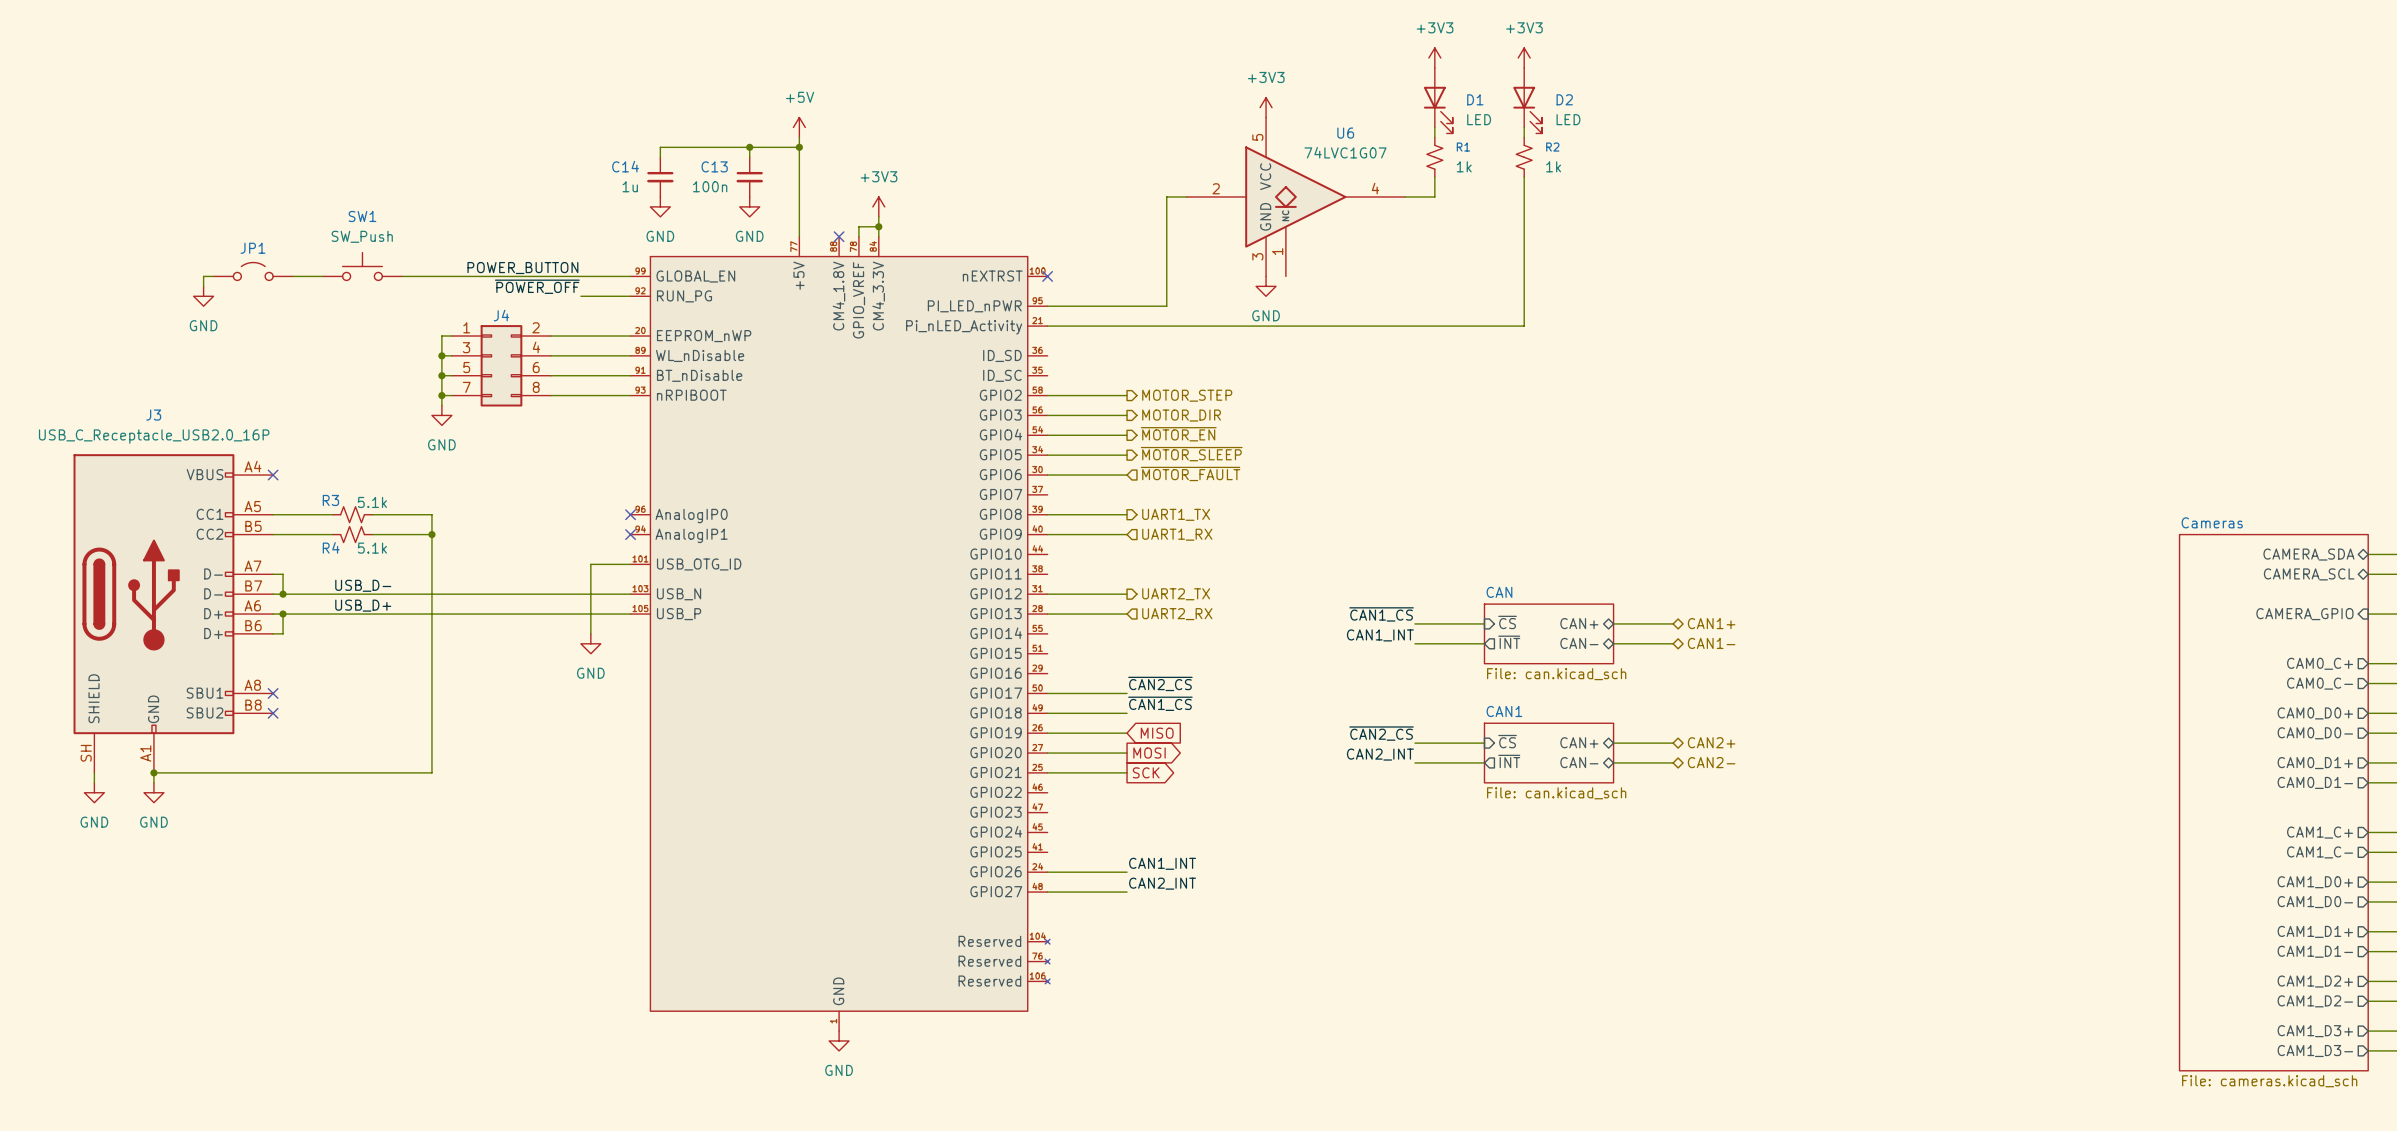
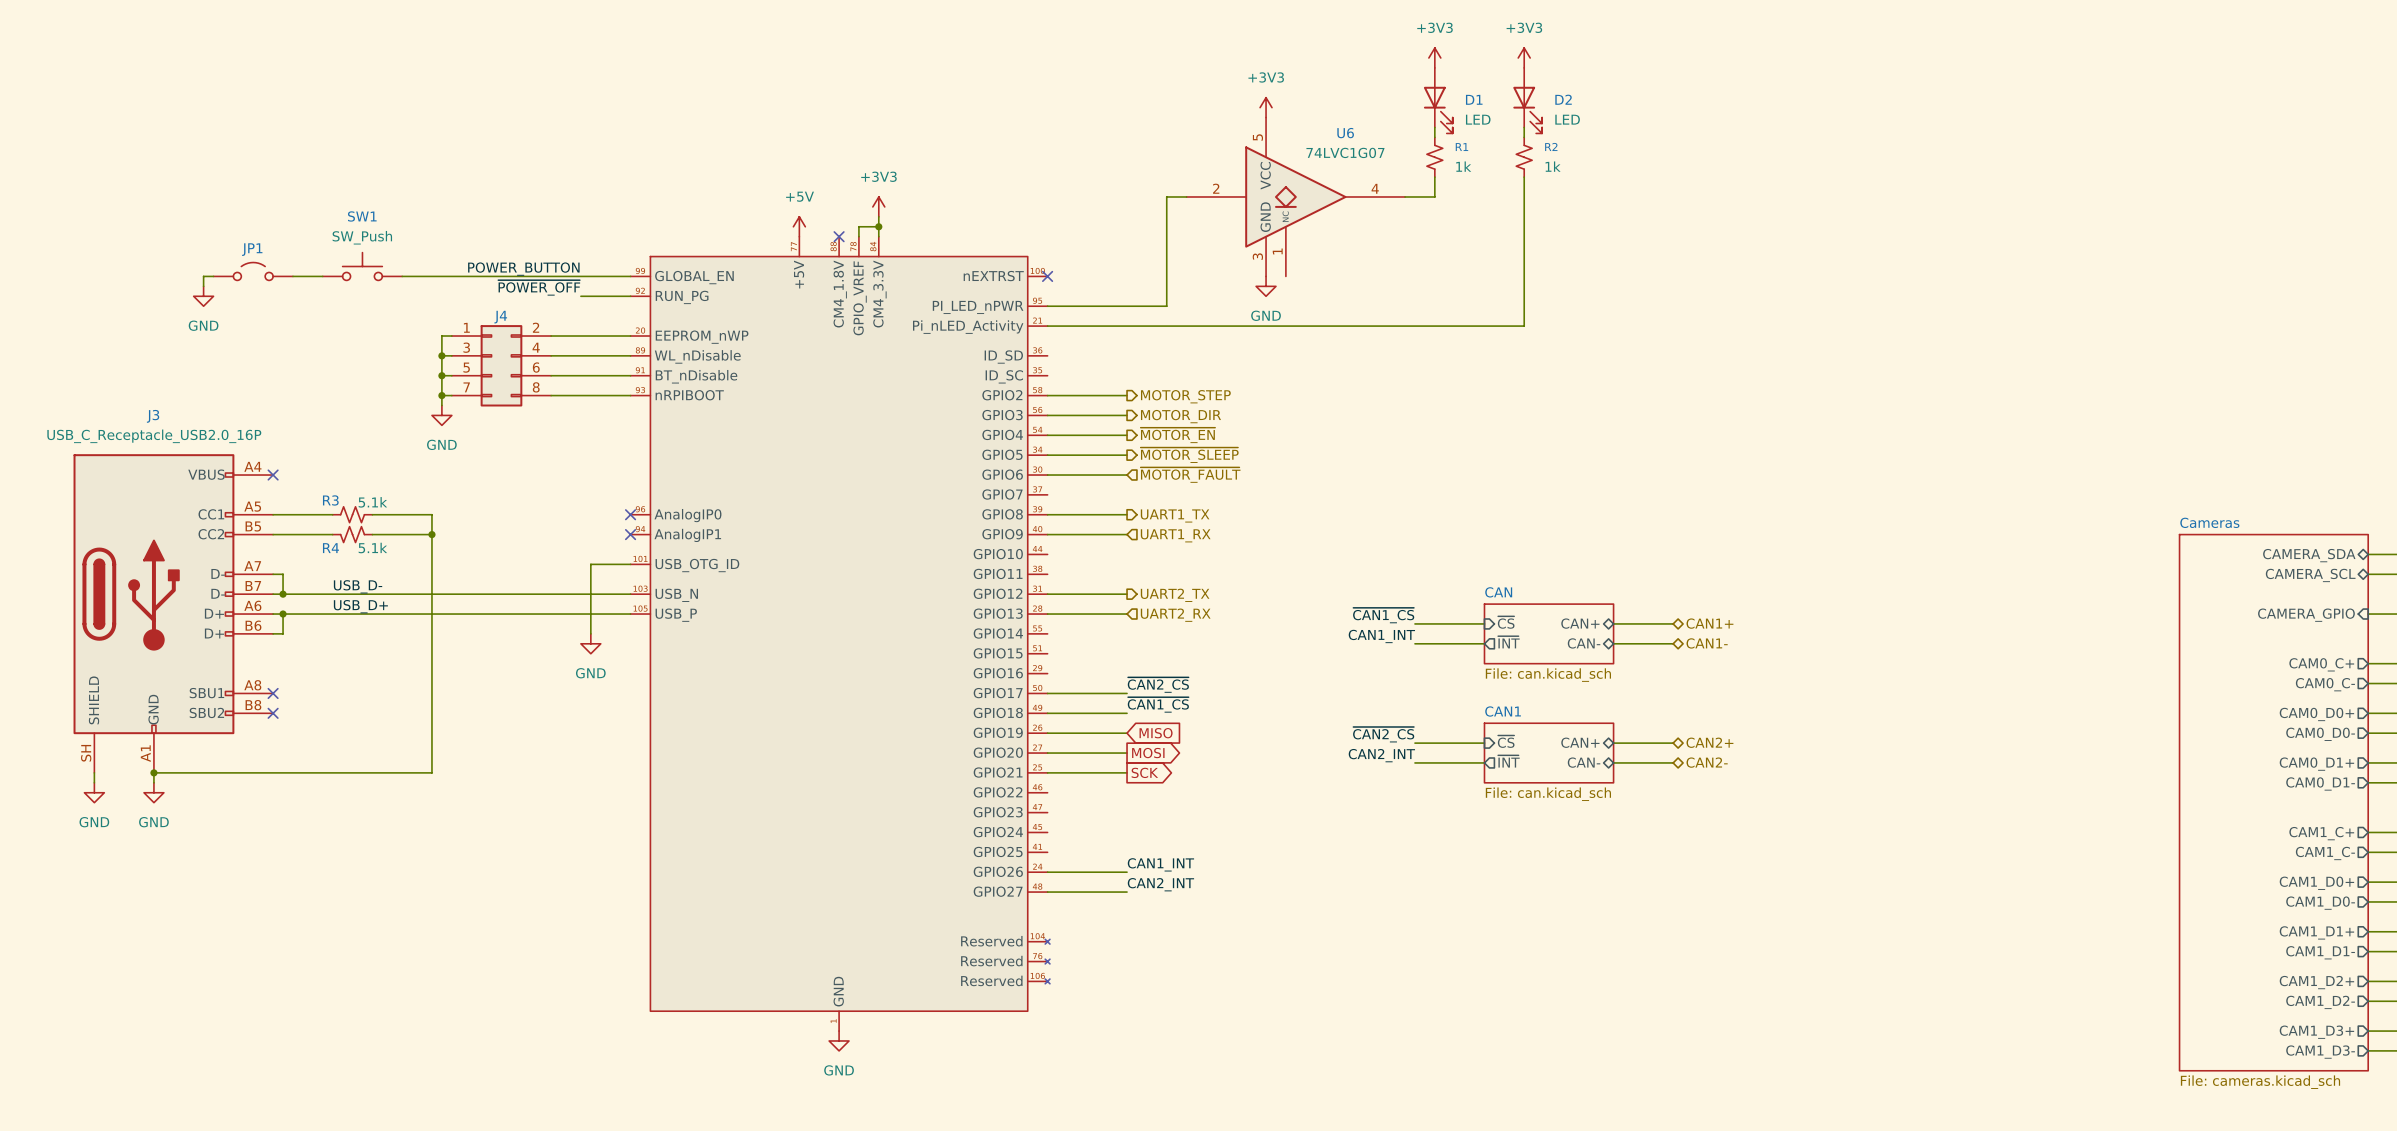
power symbol position: +5V (799, 127) -> +5V (799, 226)
wire: (799, 137) (799, 236) -> none
wire: (749, 147) (749, 157) -> none
junction: (749, 147) -> none
wire: (799, 147) (660, 147) (660, 157) -> none
junction: (799, 147) -> none
C14: 1u (660, 177) -> none
C13: 100n (749, 177) -> none
power symbol: GND (660, 206) -> none
power symbol: GND (749, 206) -> none

